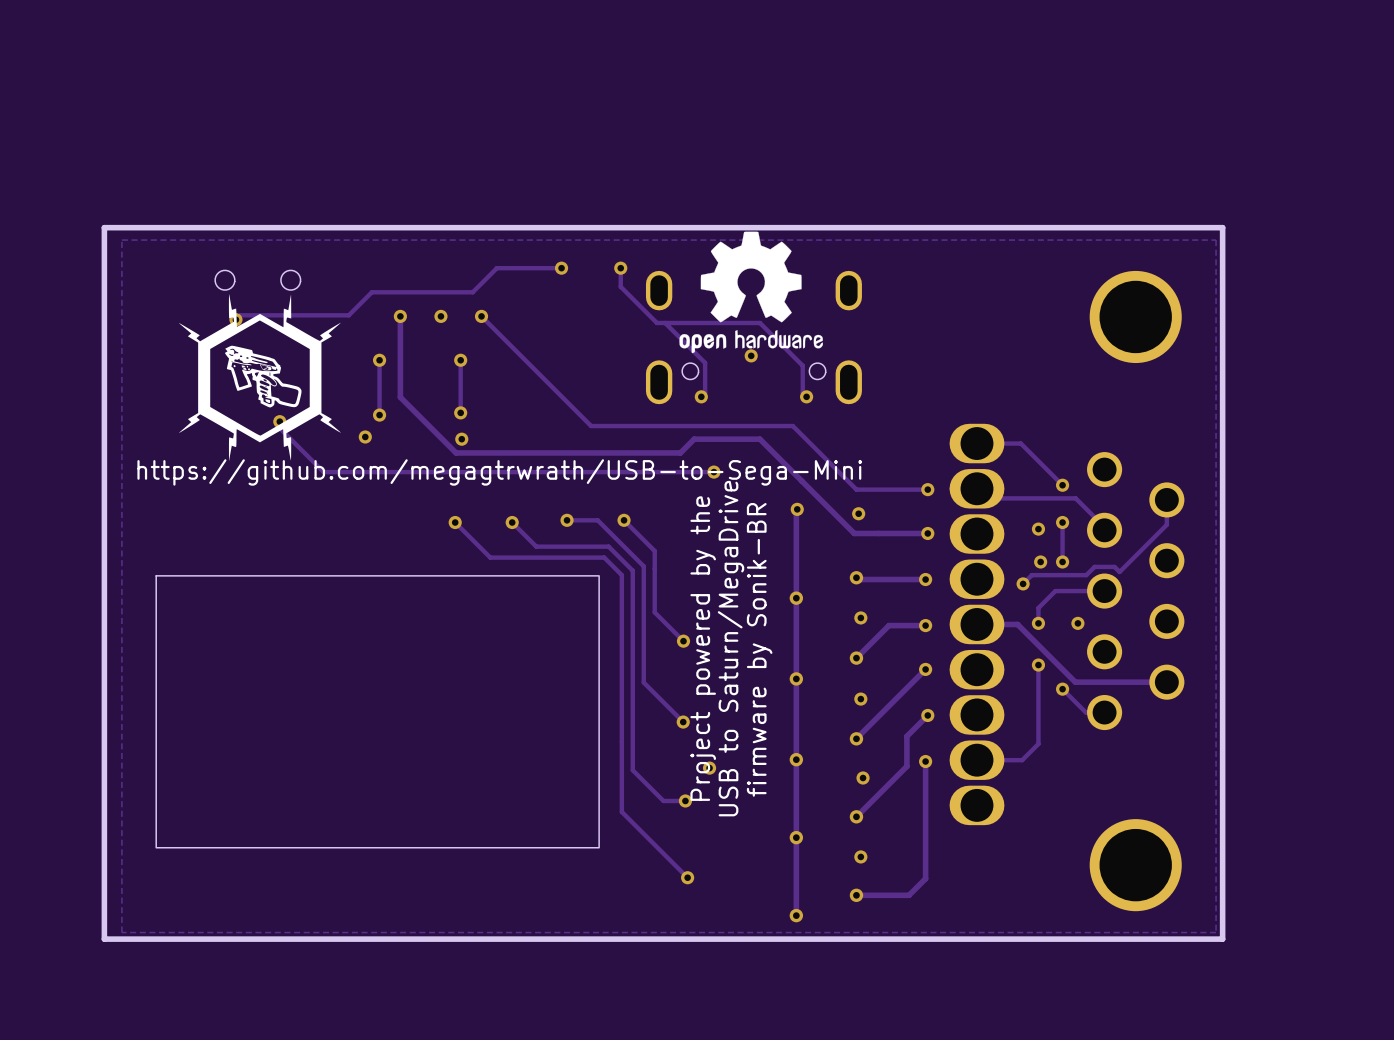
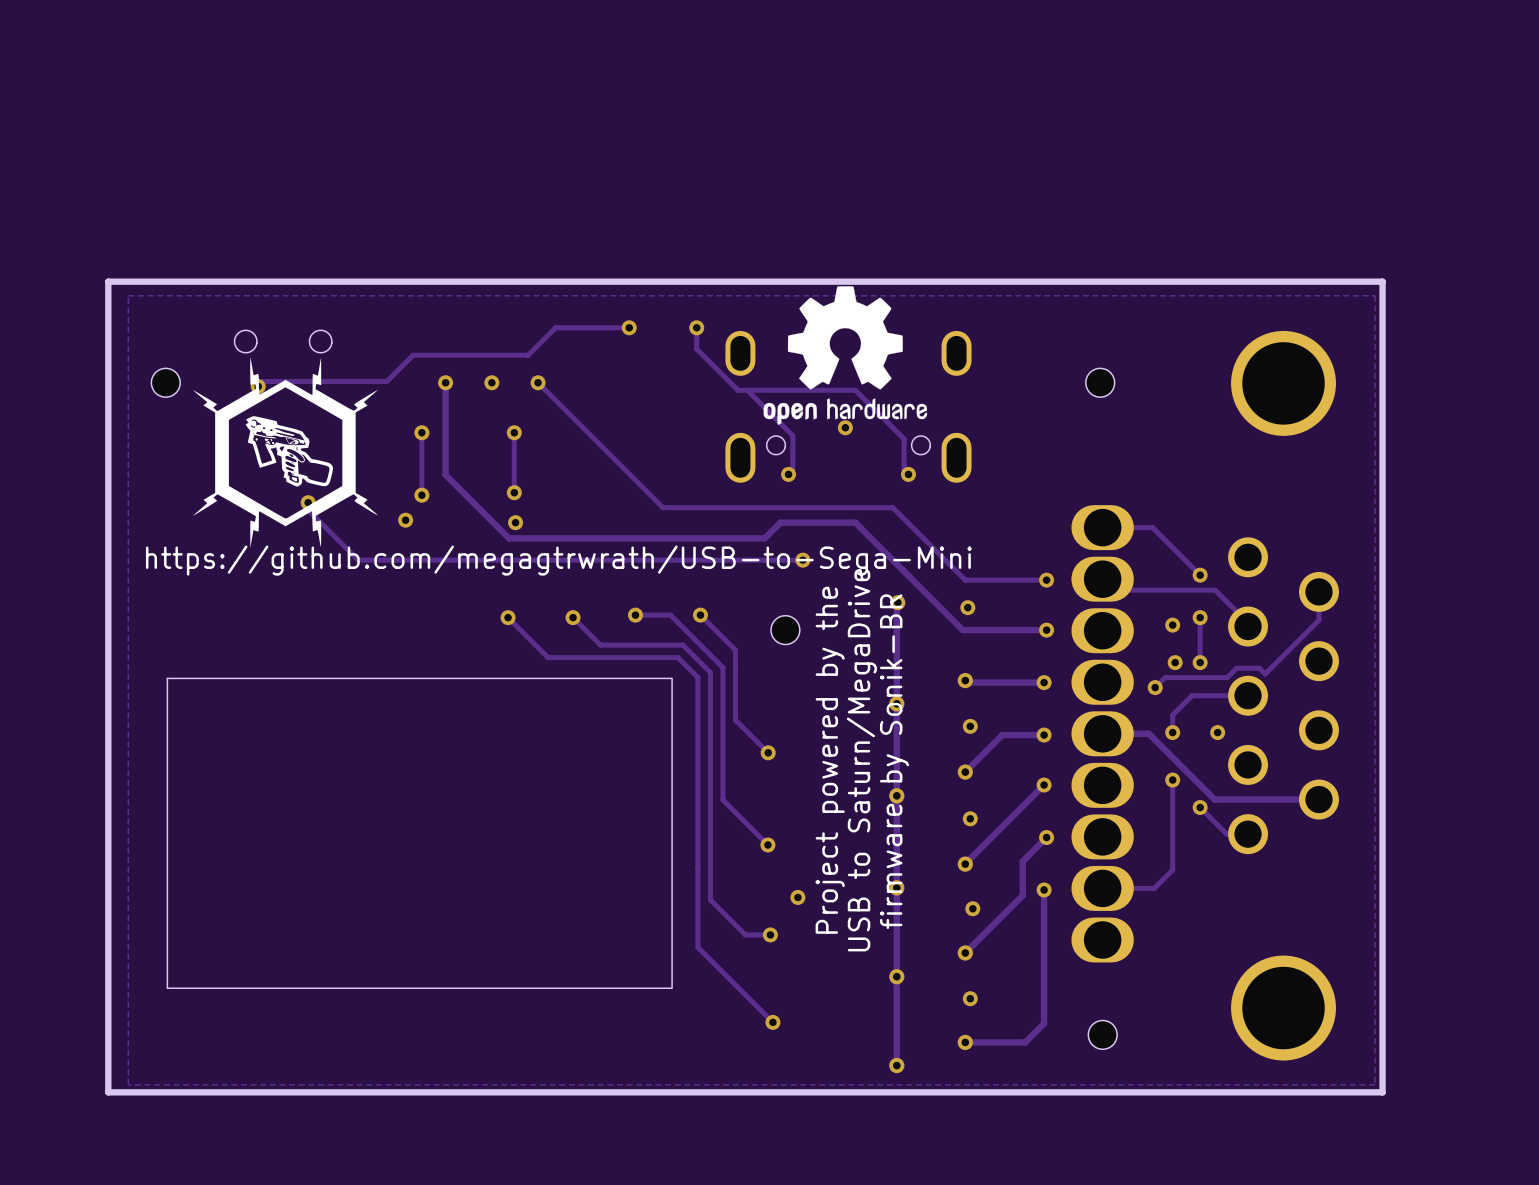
part: none -> (165, 382)
part: none -> (1100, 382)
part: none -> (785, 630)
text: Project powered by the (703, 648) -> none
text: USB to Saturn/MegaDrive (731, 648) -> Project powered by the (830, 760)
text: none -> firmware by Sonik-BR (894, 761)
text: firmware by Sonik-BR (759, 649) -> USB to Saturn/MegaDrive (861, 760)
part: none -> (1102, 1034)

